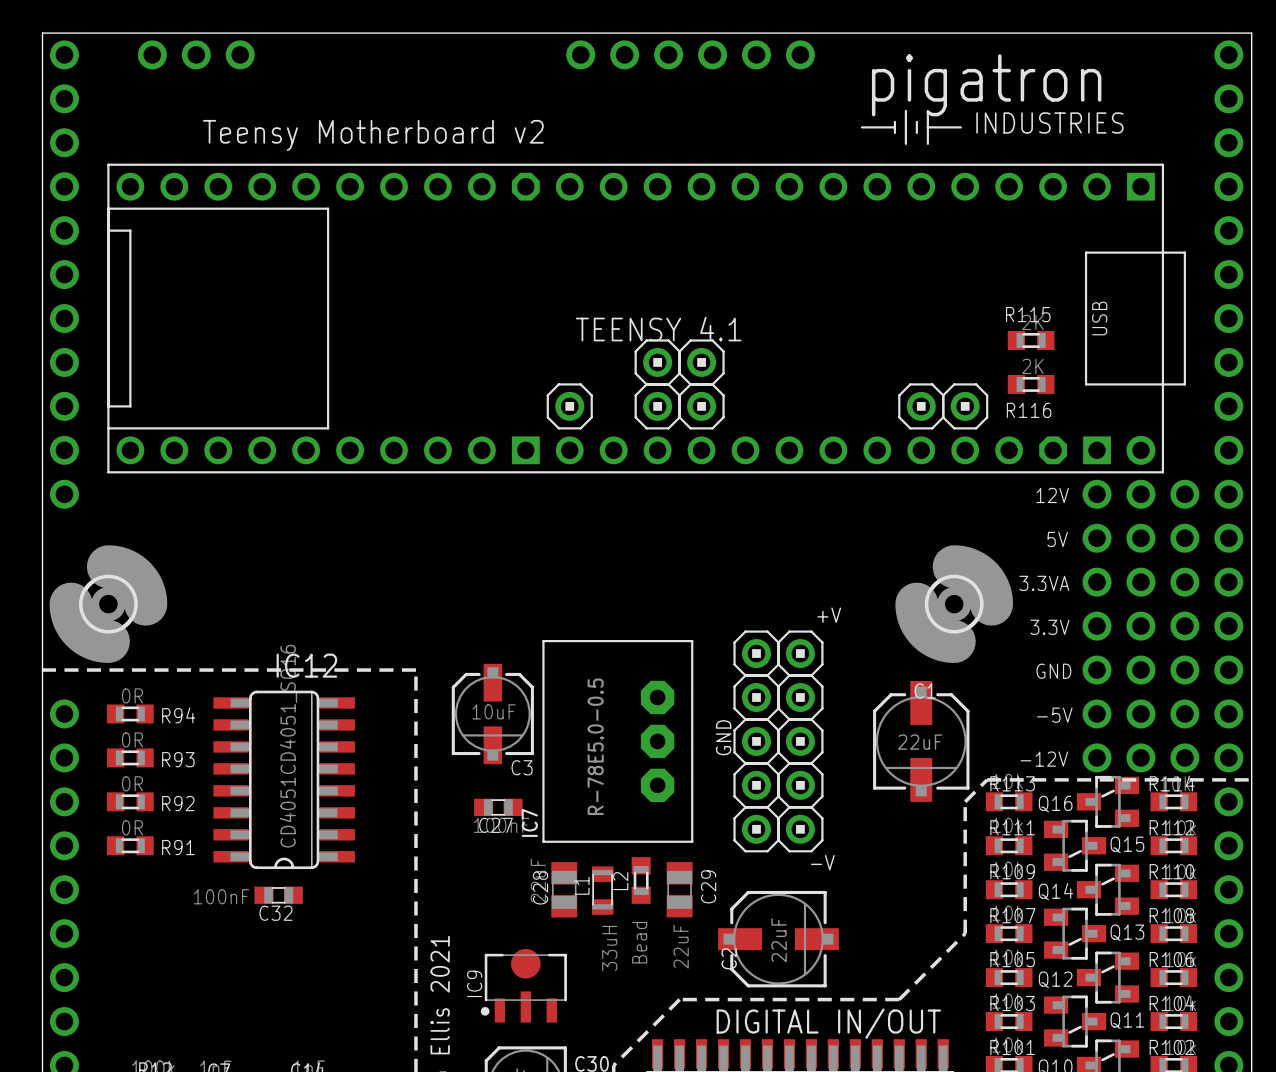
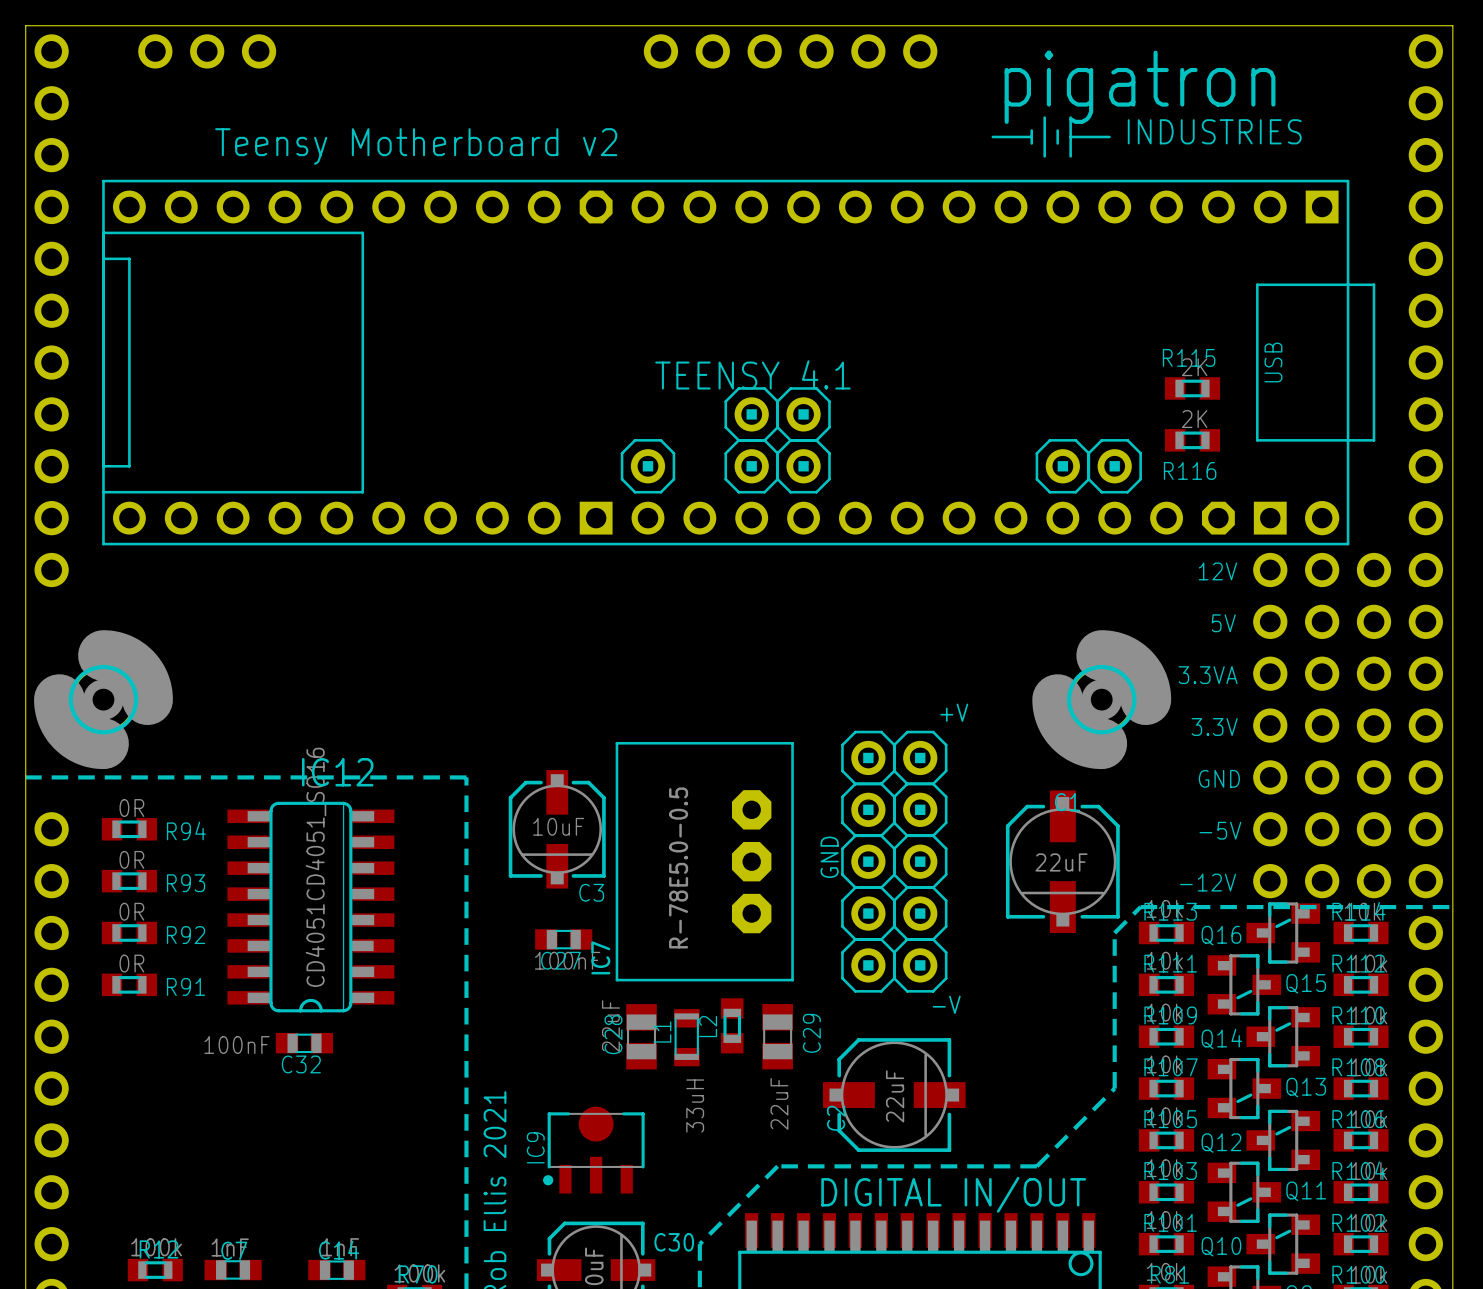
text: Bead (639, 942) -> none

